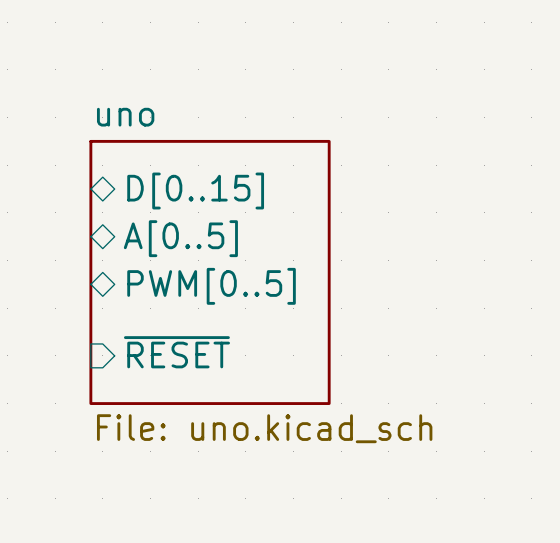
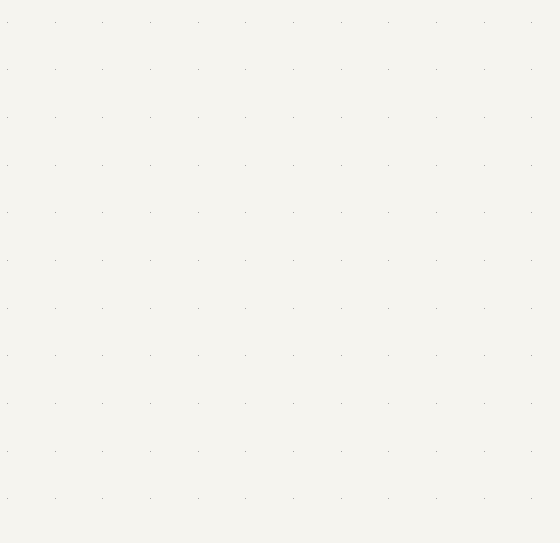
sheet pin: D[0..15] (195, 191) -> none
sheet pin: A[0..5] (180, 238) -> none
sheet uno: File: uno.kicad_sch (210, 272) -> none
sheet pin: PWM[0..5] (211, 286) -> none
sheet pin: ~{RESET} (176, 352) -> none

